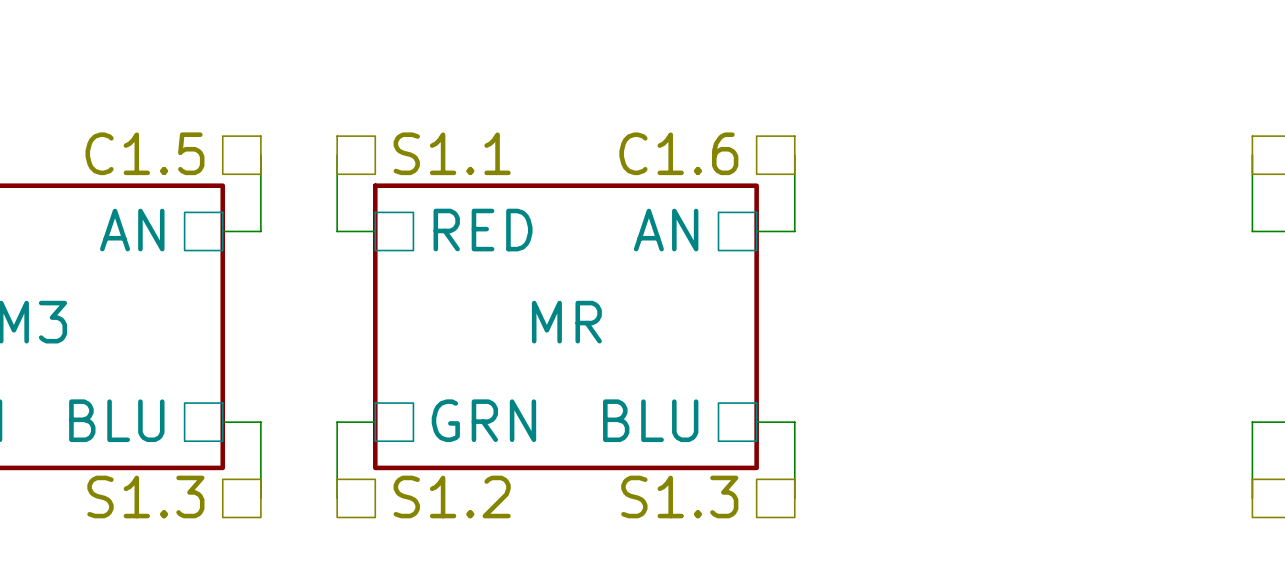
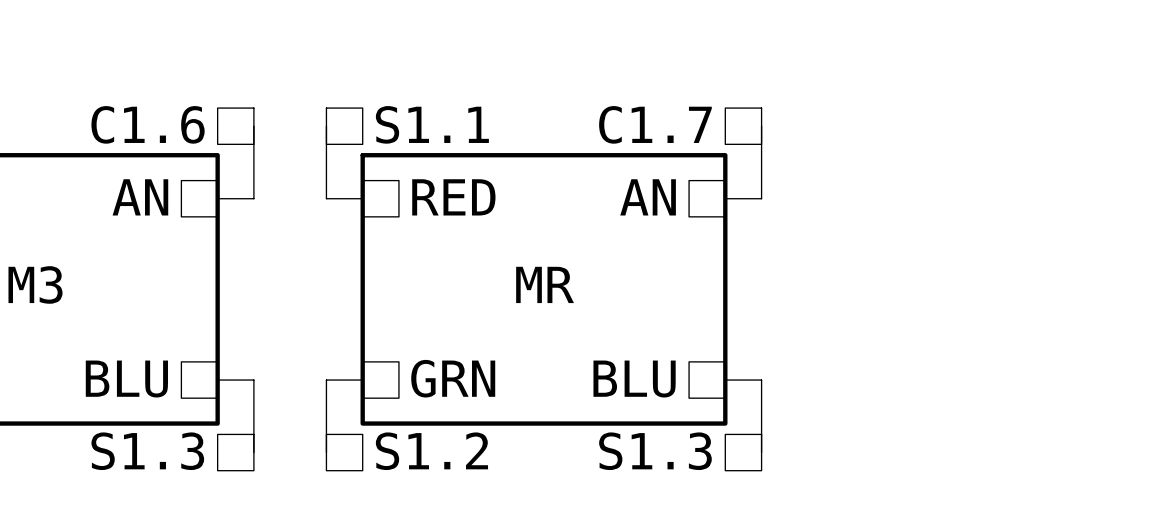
hierarchical label: C1.5 (144, 153) -> C1.6 (148, 124)
hierarchical label: C1.6 (678, 153) -> C1.7 (655, 124)

